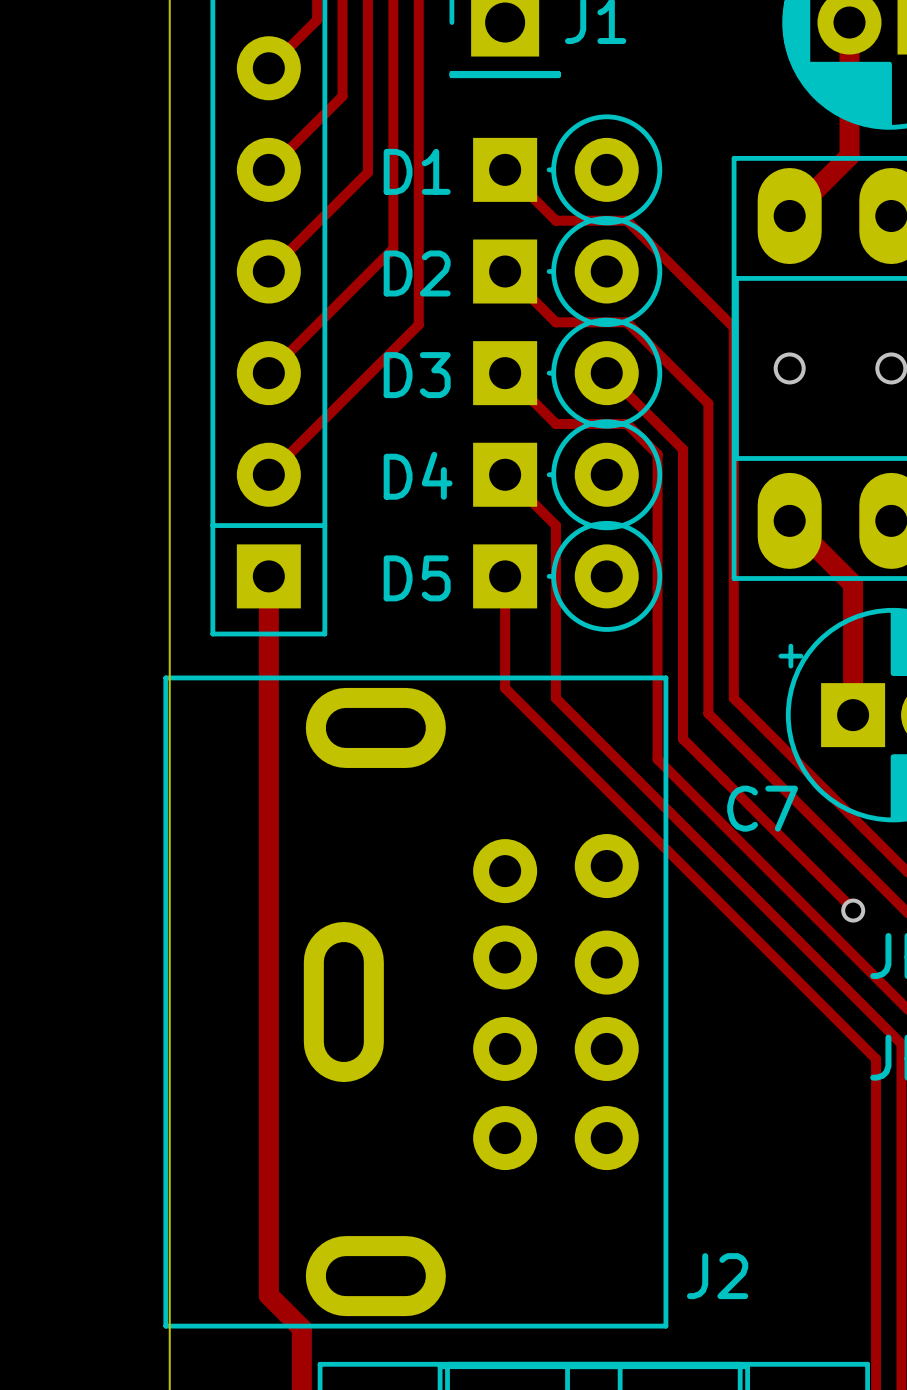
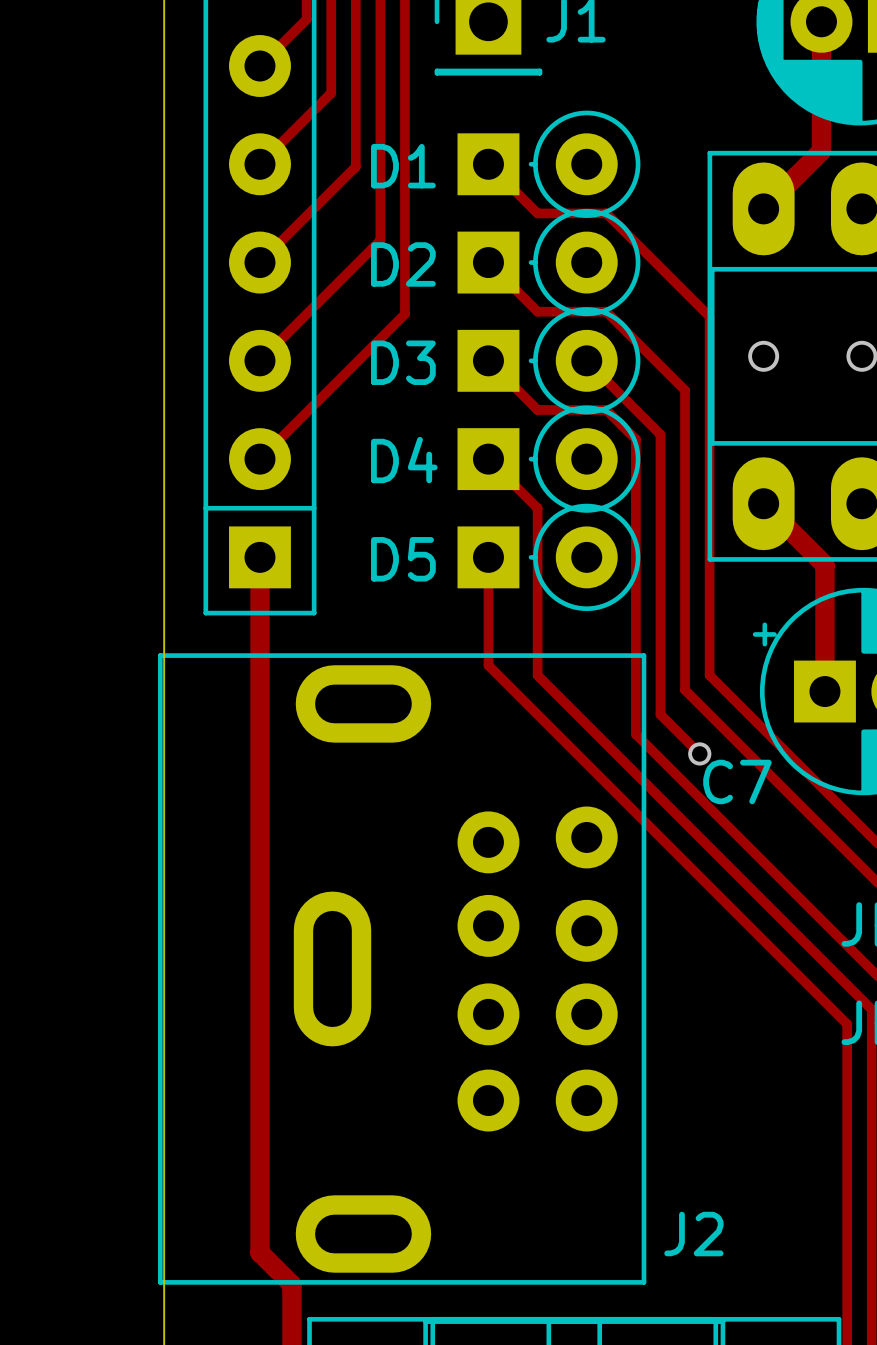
track: (723, 779) (853, 909) -> none
via position: (853, 910) -> (699, 753)

